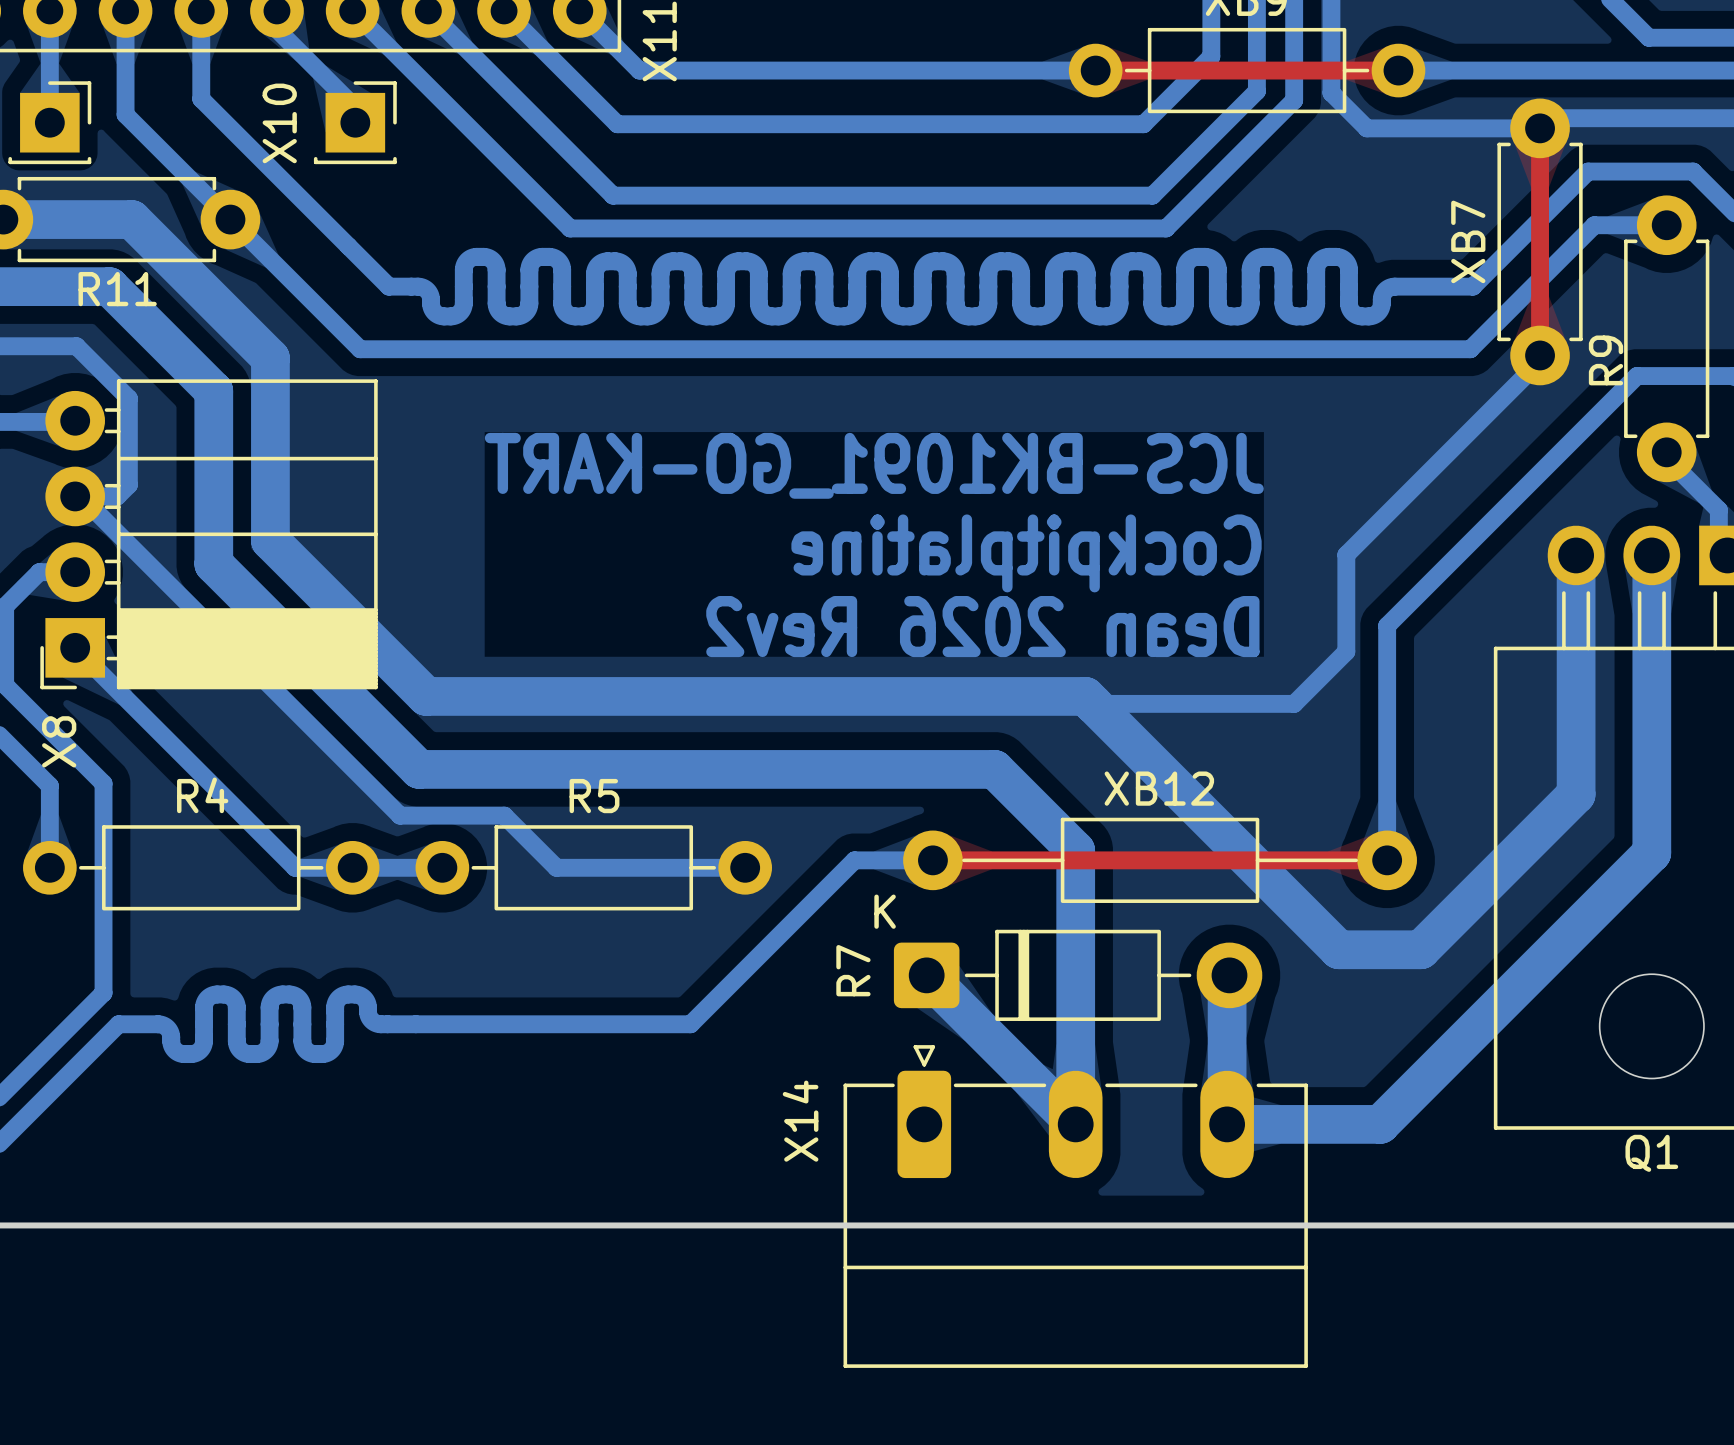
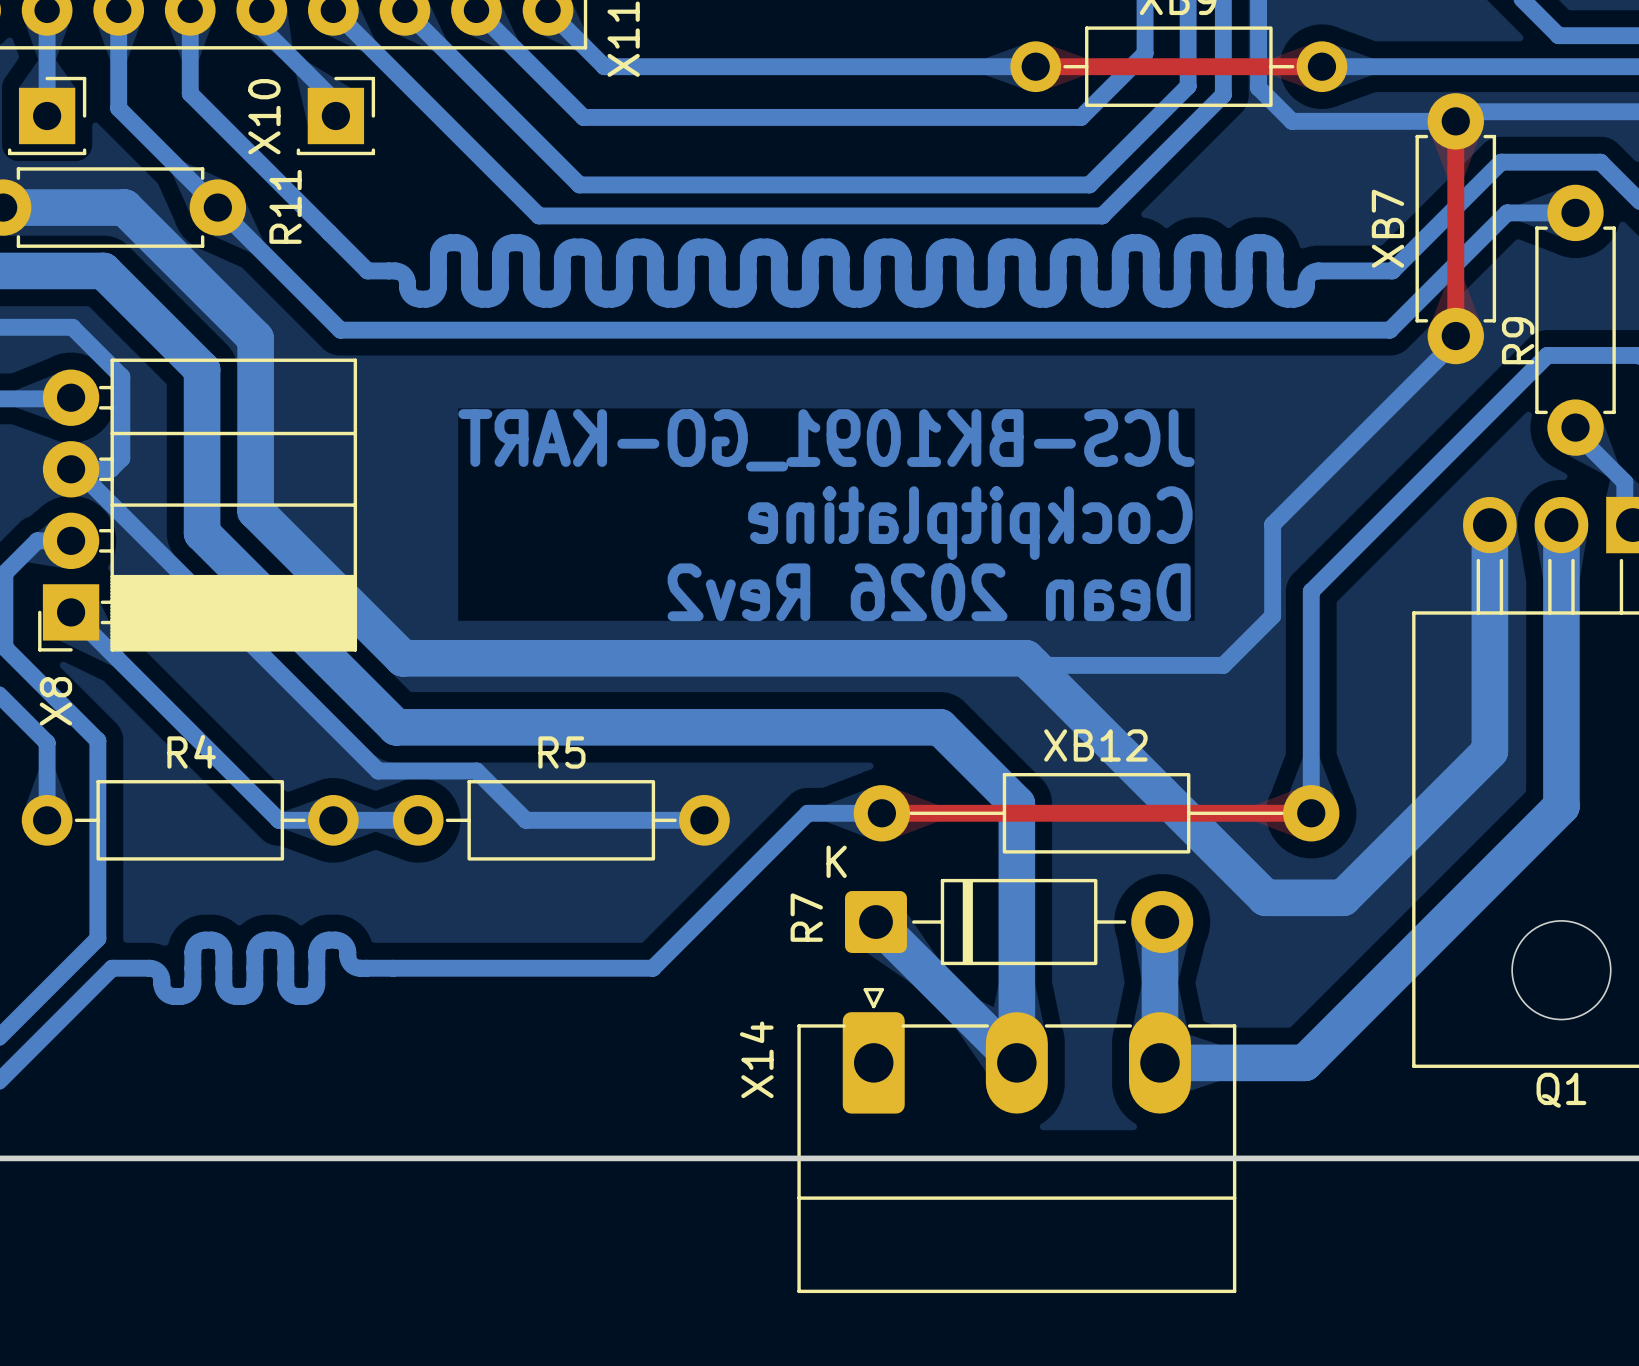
R11 name rotation: 0° (117, 289) -> 90° counterclockwise (285, 206)
R11 name position: R11 (117, 289) -> R11 (285, 206)
X14 footprint: [843, 1045, 1308, 1368] -> [797, 987, 1237, 1294]

